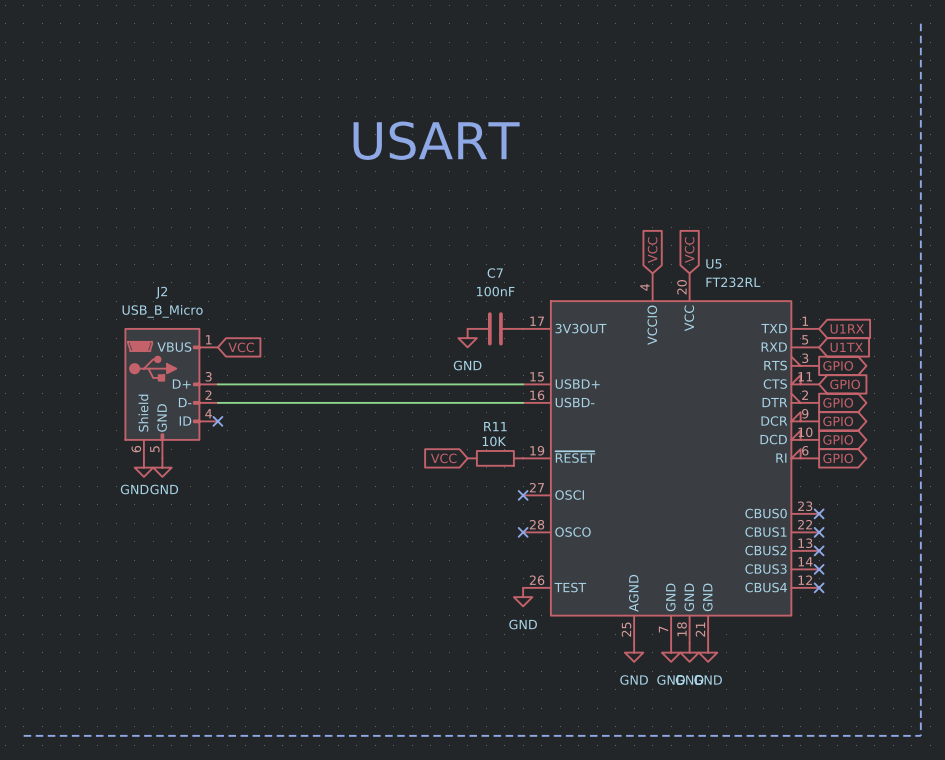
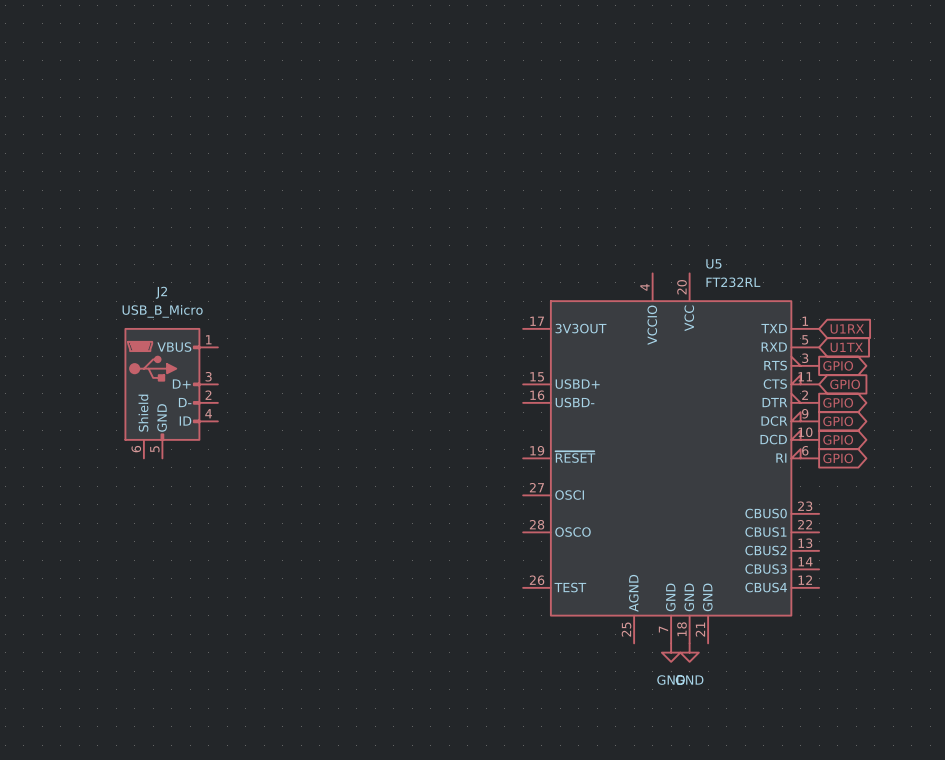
line: (920, 23) (920, 735) (23, 735) -> none
text: USART (436, 140) -> none
global label: VCC (652, 250) -> none
global label: VCC (689, 250) -> none
C7: 100nF (495, 328) -> none
power symbol: GND (467, 338) -> none
global label: VCC (241, 347) -> none
wire: (217, 384) (523, 384) -> none
wire: (217, 402) (523, 402) -> none
no-connect mark: (217, 421) -> none
global label: VCC (443, 458) -> none
R11: 10K (495, 458) -> none
power symbol: GND (143, 467) -> none
power symbol: GND (162, 467) -> none
no-connect mark: (523, 495) -> none
no-connect mark: (819, 513) -> none
no-connect mark: (523, 532) -> none
no-connect mark: (819, 532) -> none
no-connect mark: (819, 550) -> none
no-connect mark: (819, 569) -> none
no-connect mark: (819, 587) -> none
power symbol: GND (523, 597) -> none
power symbol: GND (634, 652) -> none
power symbol: GND (708, 652) -> none

